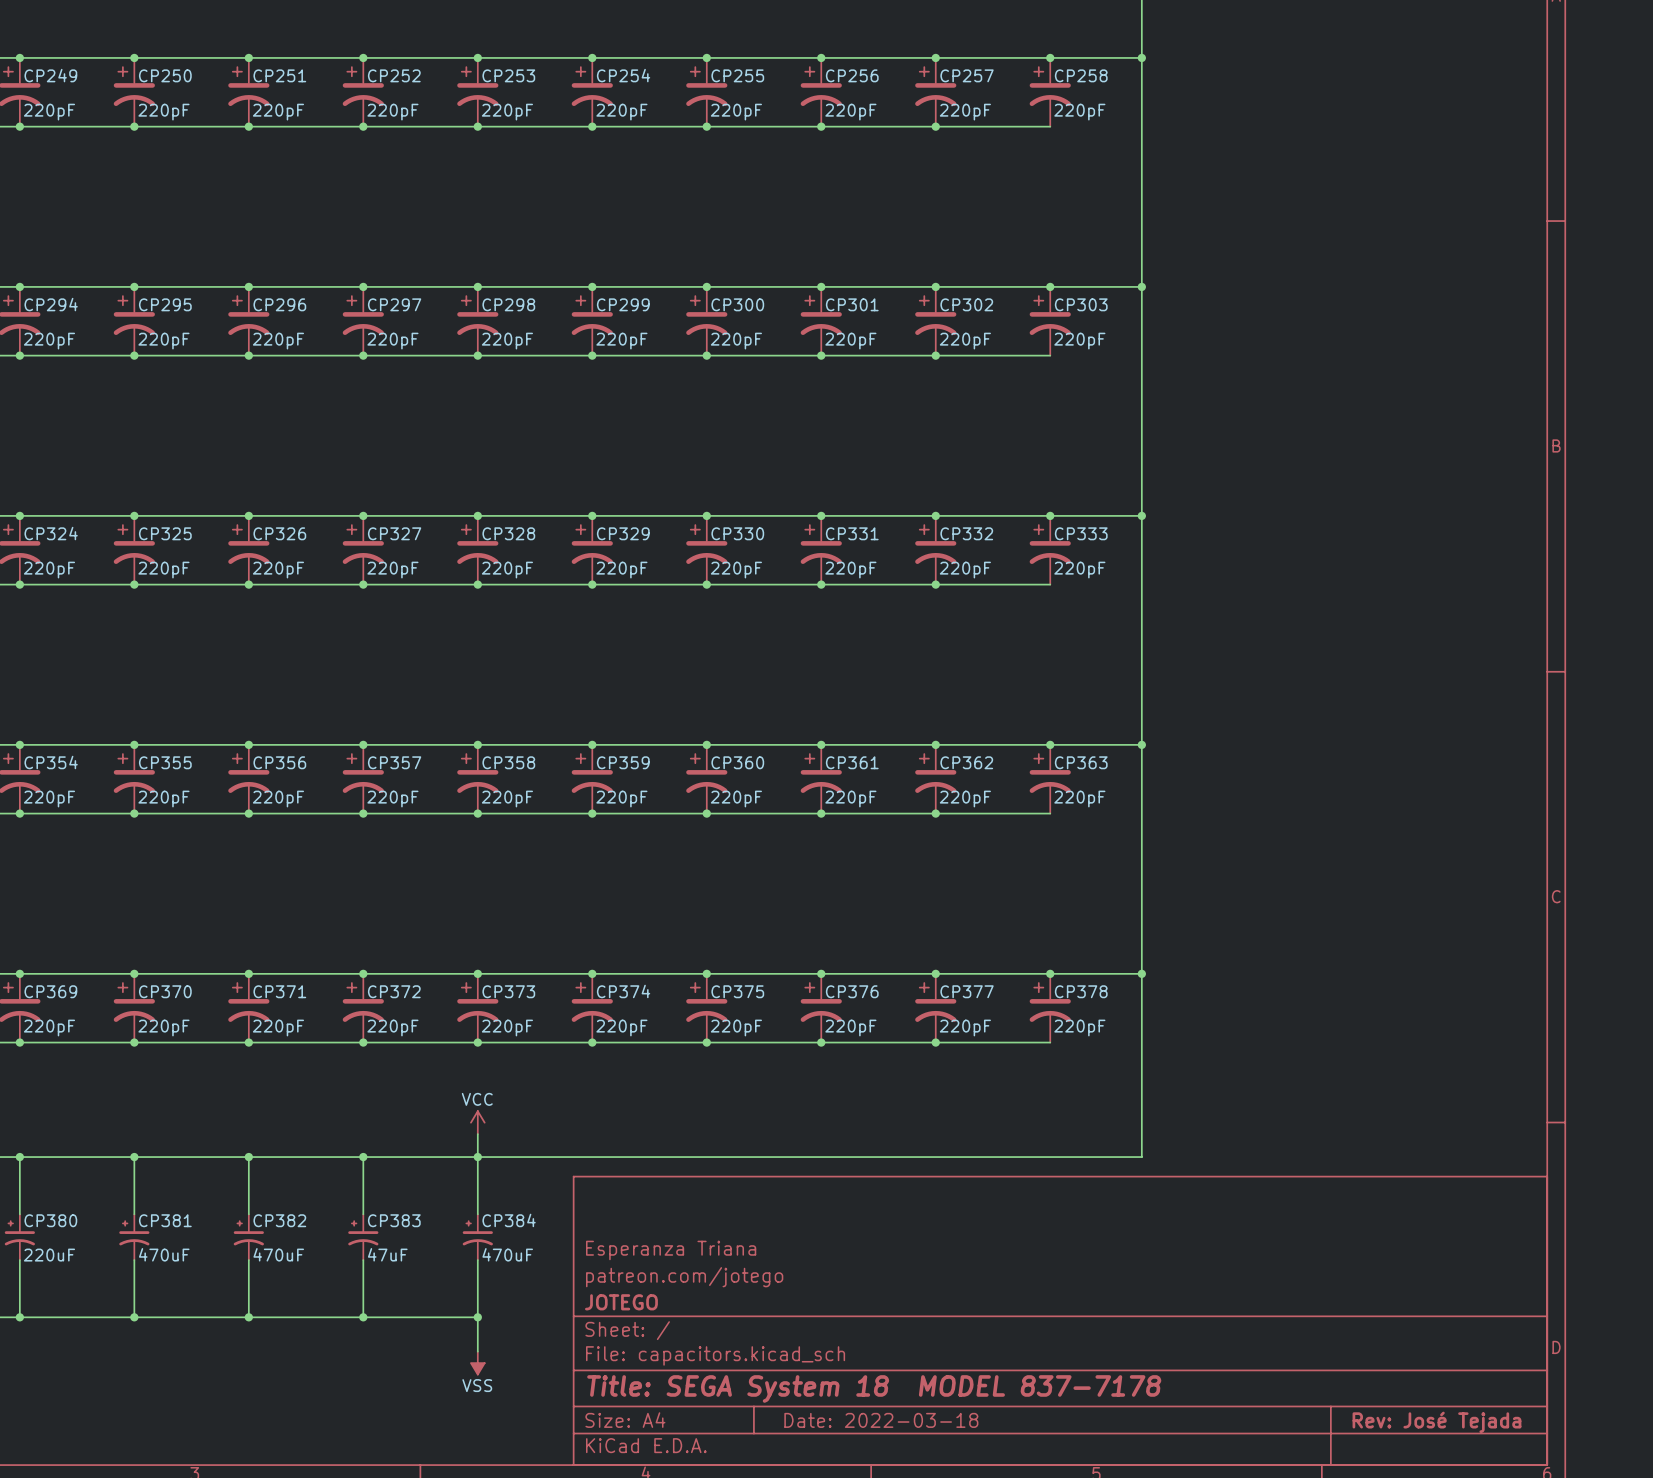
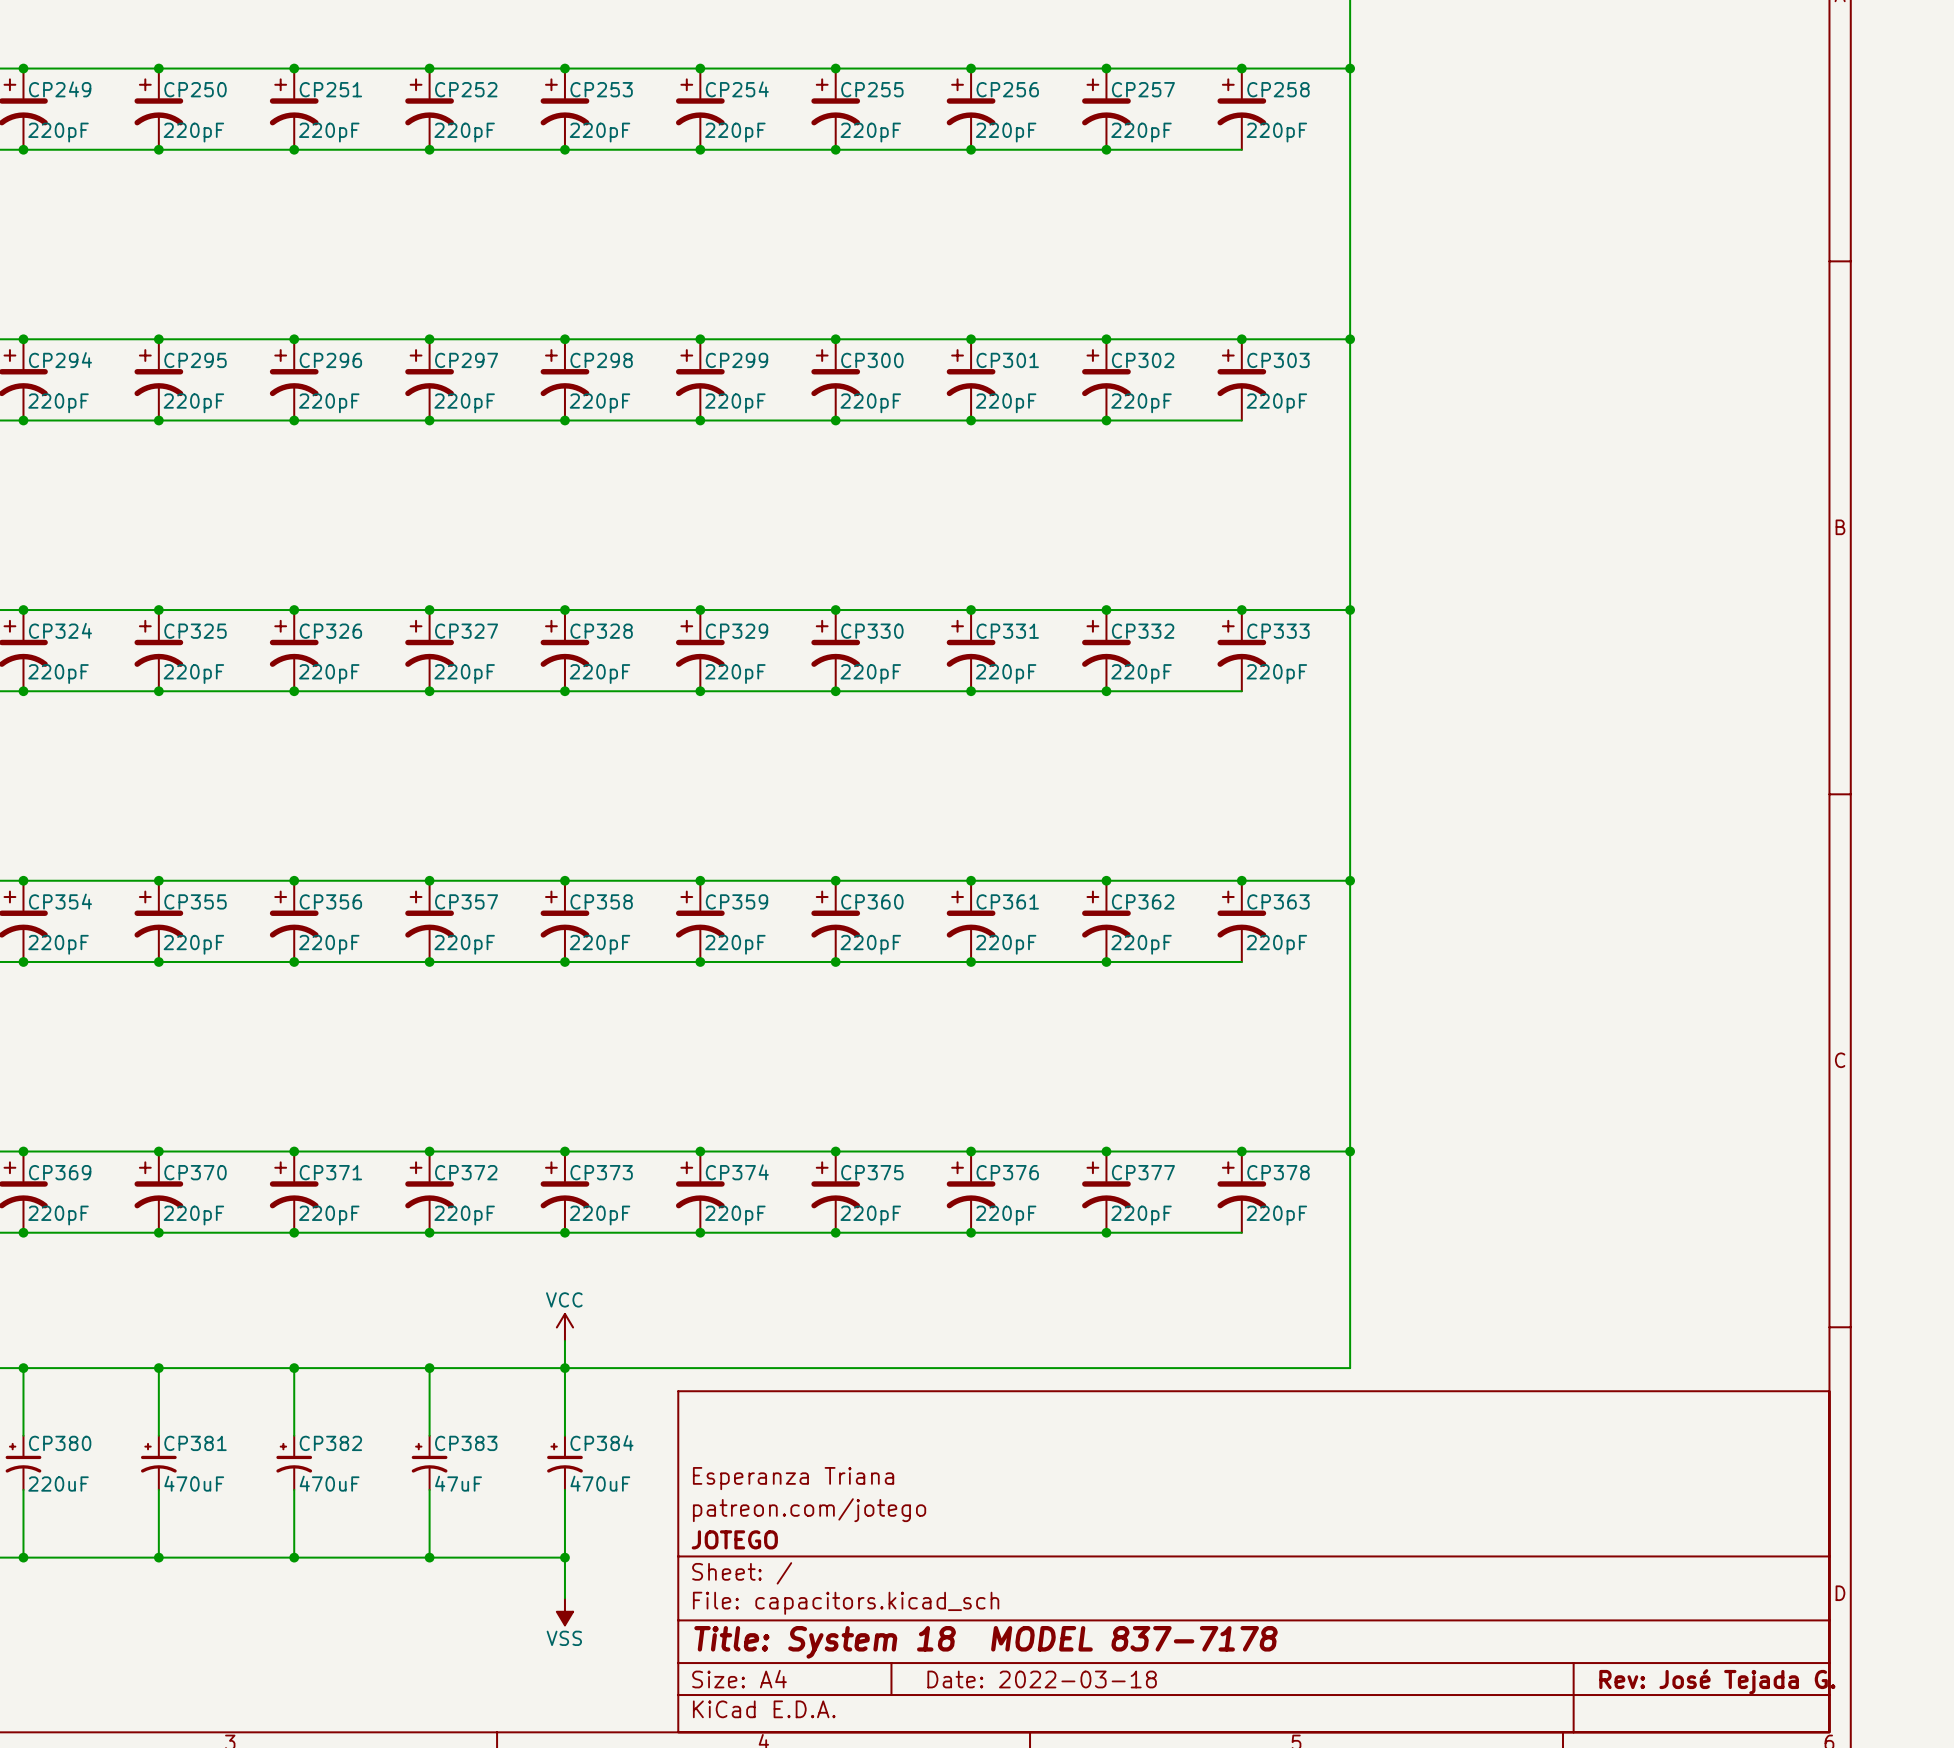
title block: Title: SEGA System 18 MODEL 837-7178 (874, 1388) -> Title: System 18 MODEL 837-7178 (986, 1642)
title block: Rev: José Tejada (1436, 1422) -> Rev: José Tejada G. (1717, 1681)

